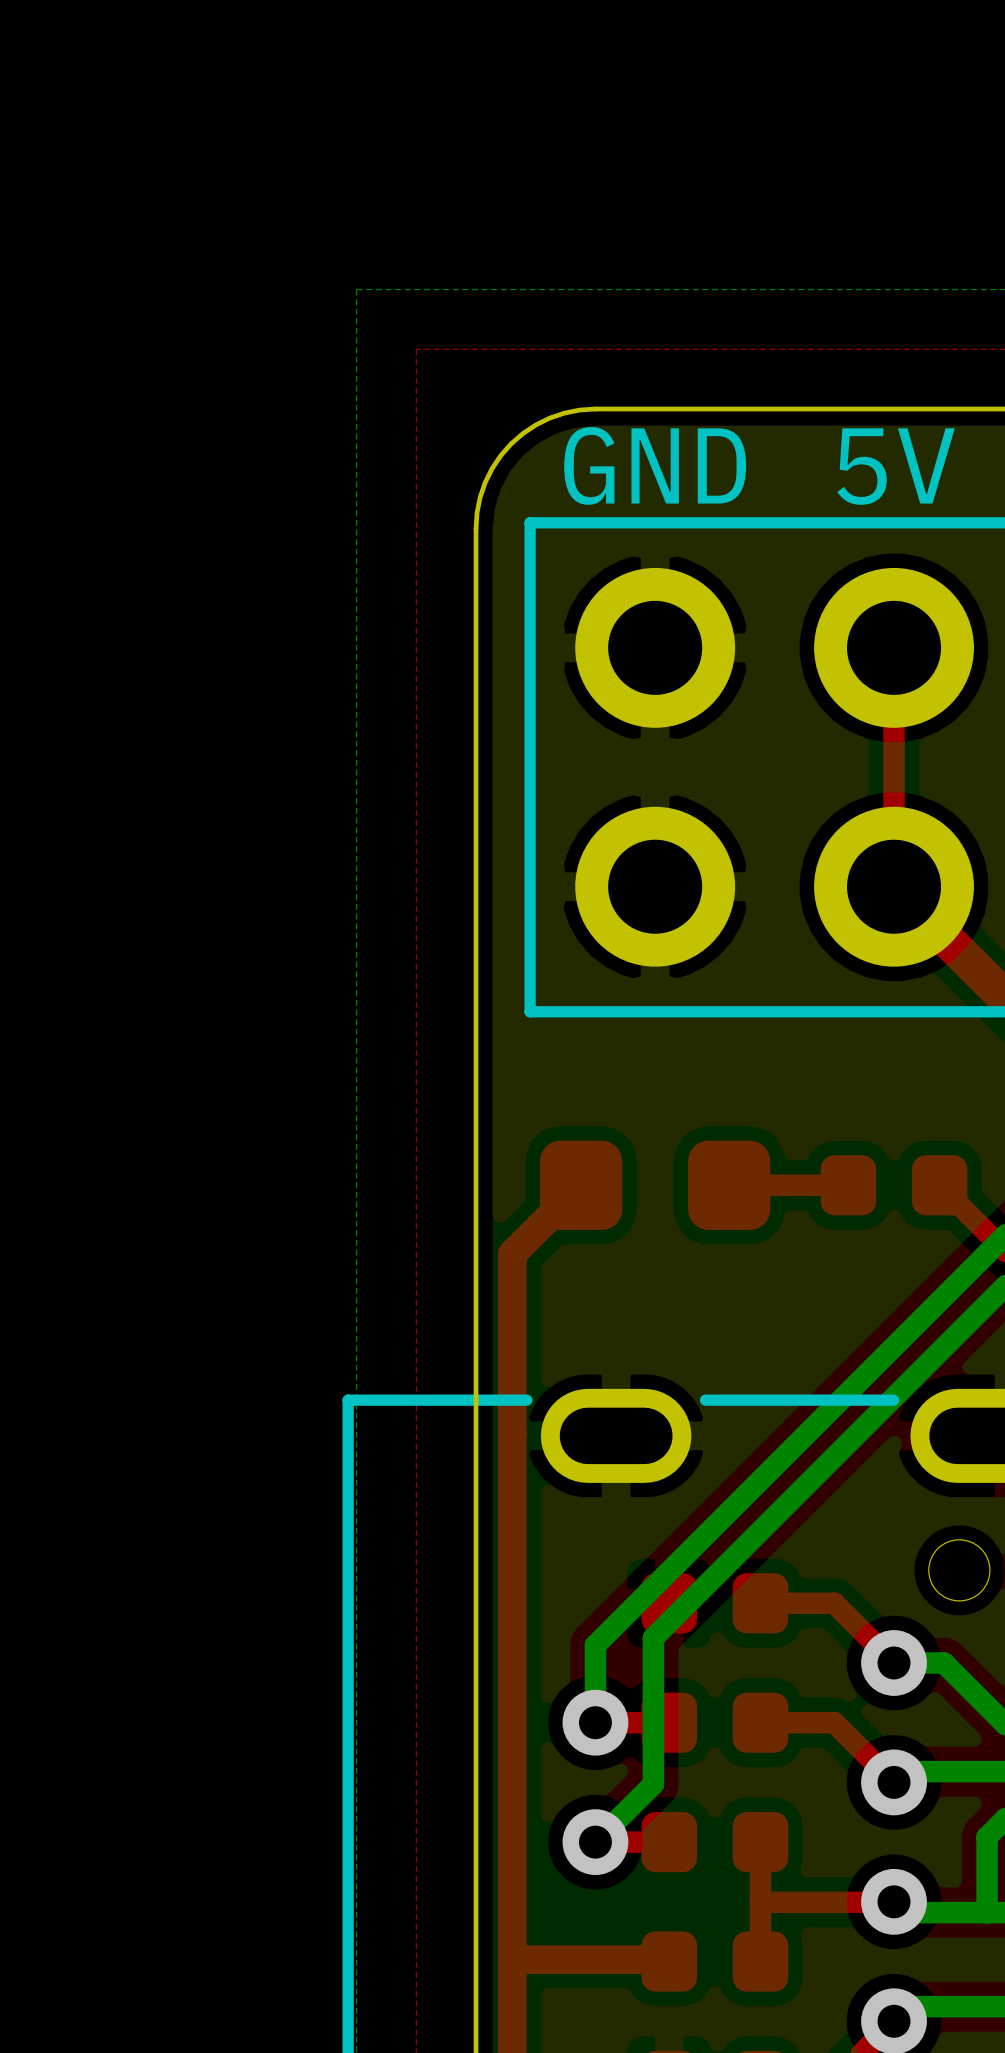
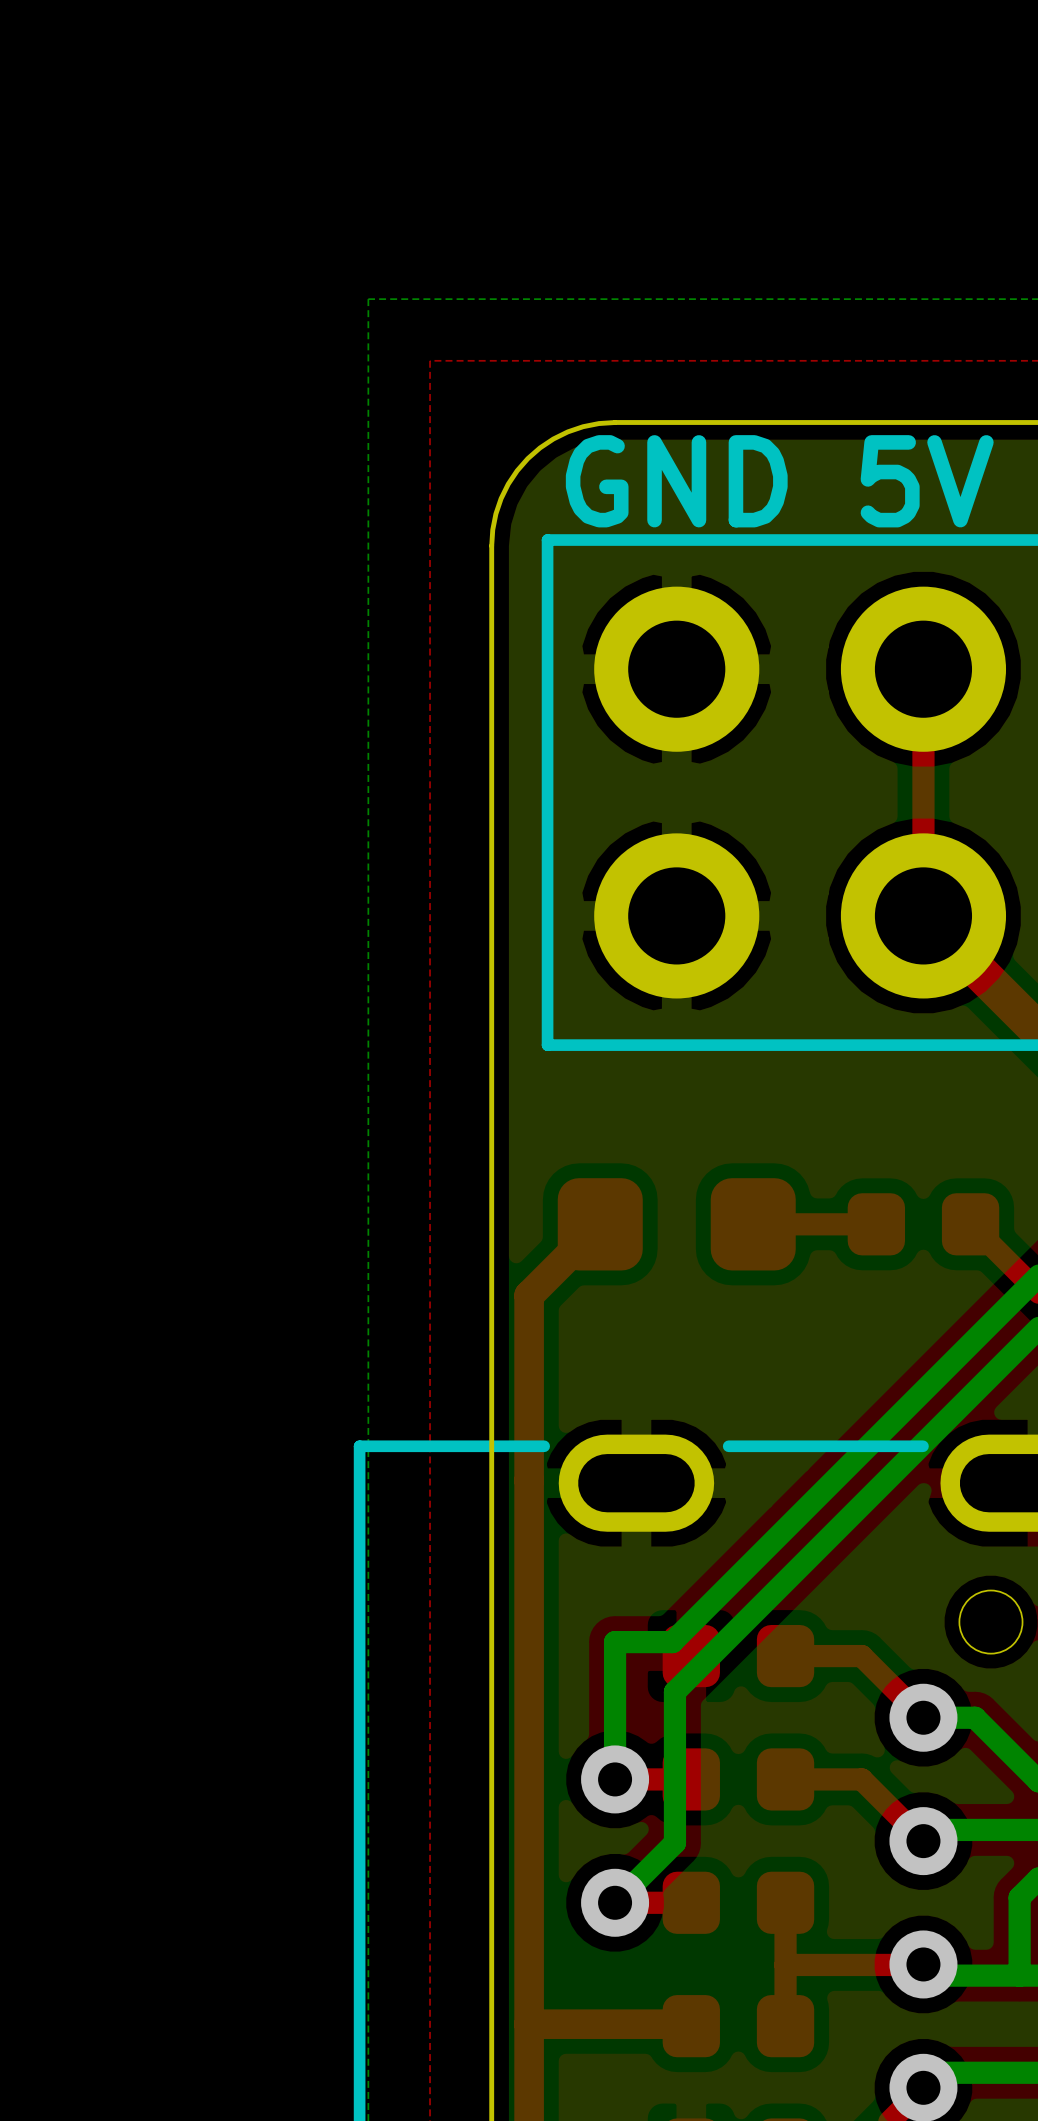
bottom track: (651, 1589) (595, 1645) -> (672, 1642) (615, 1642) (615, 1699)

